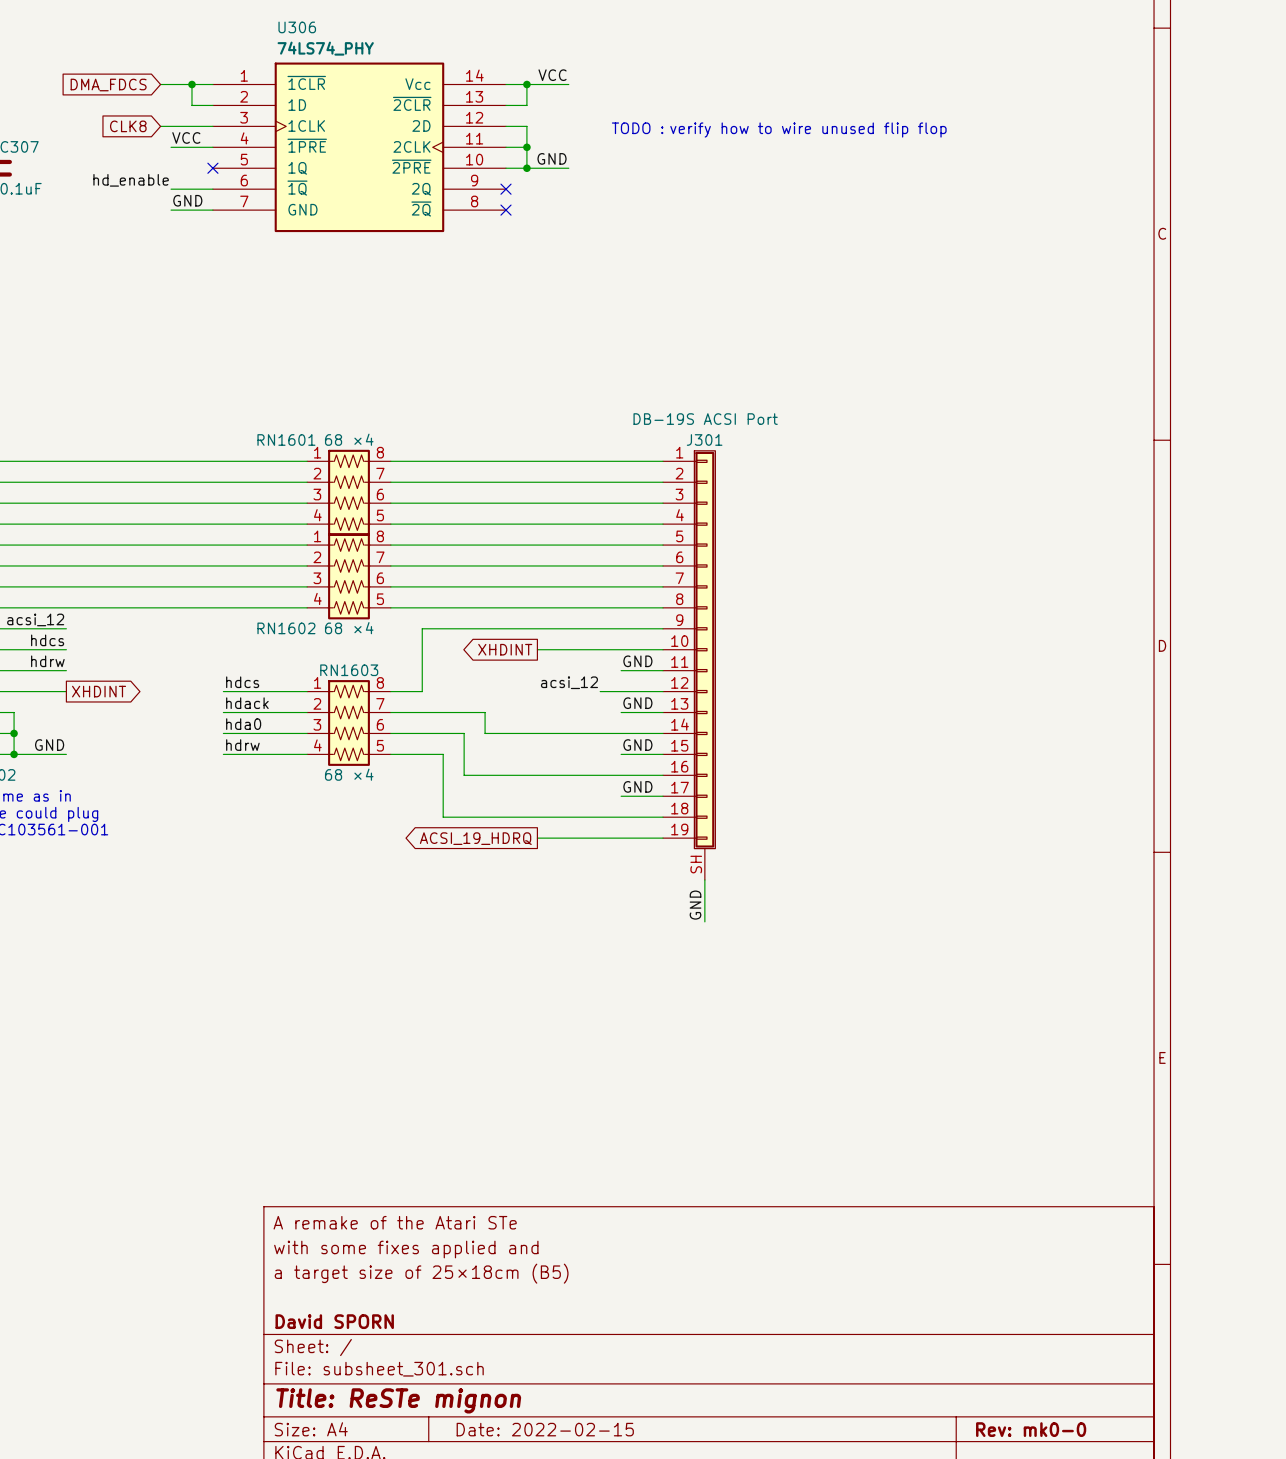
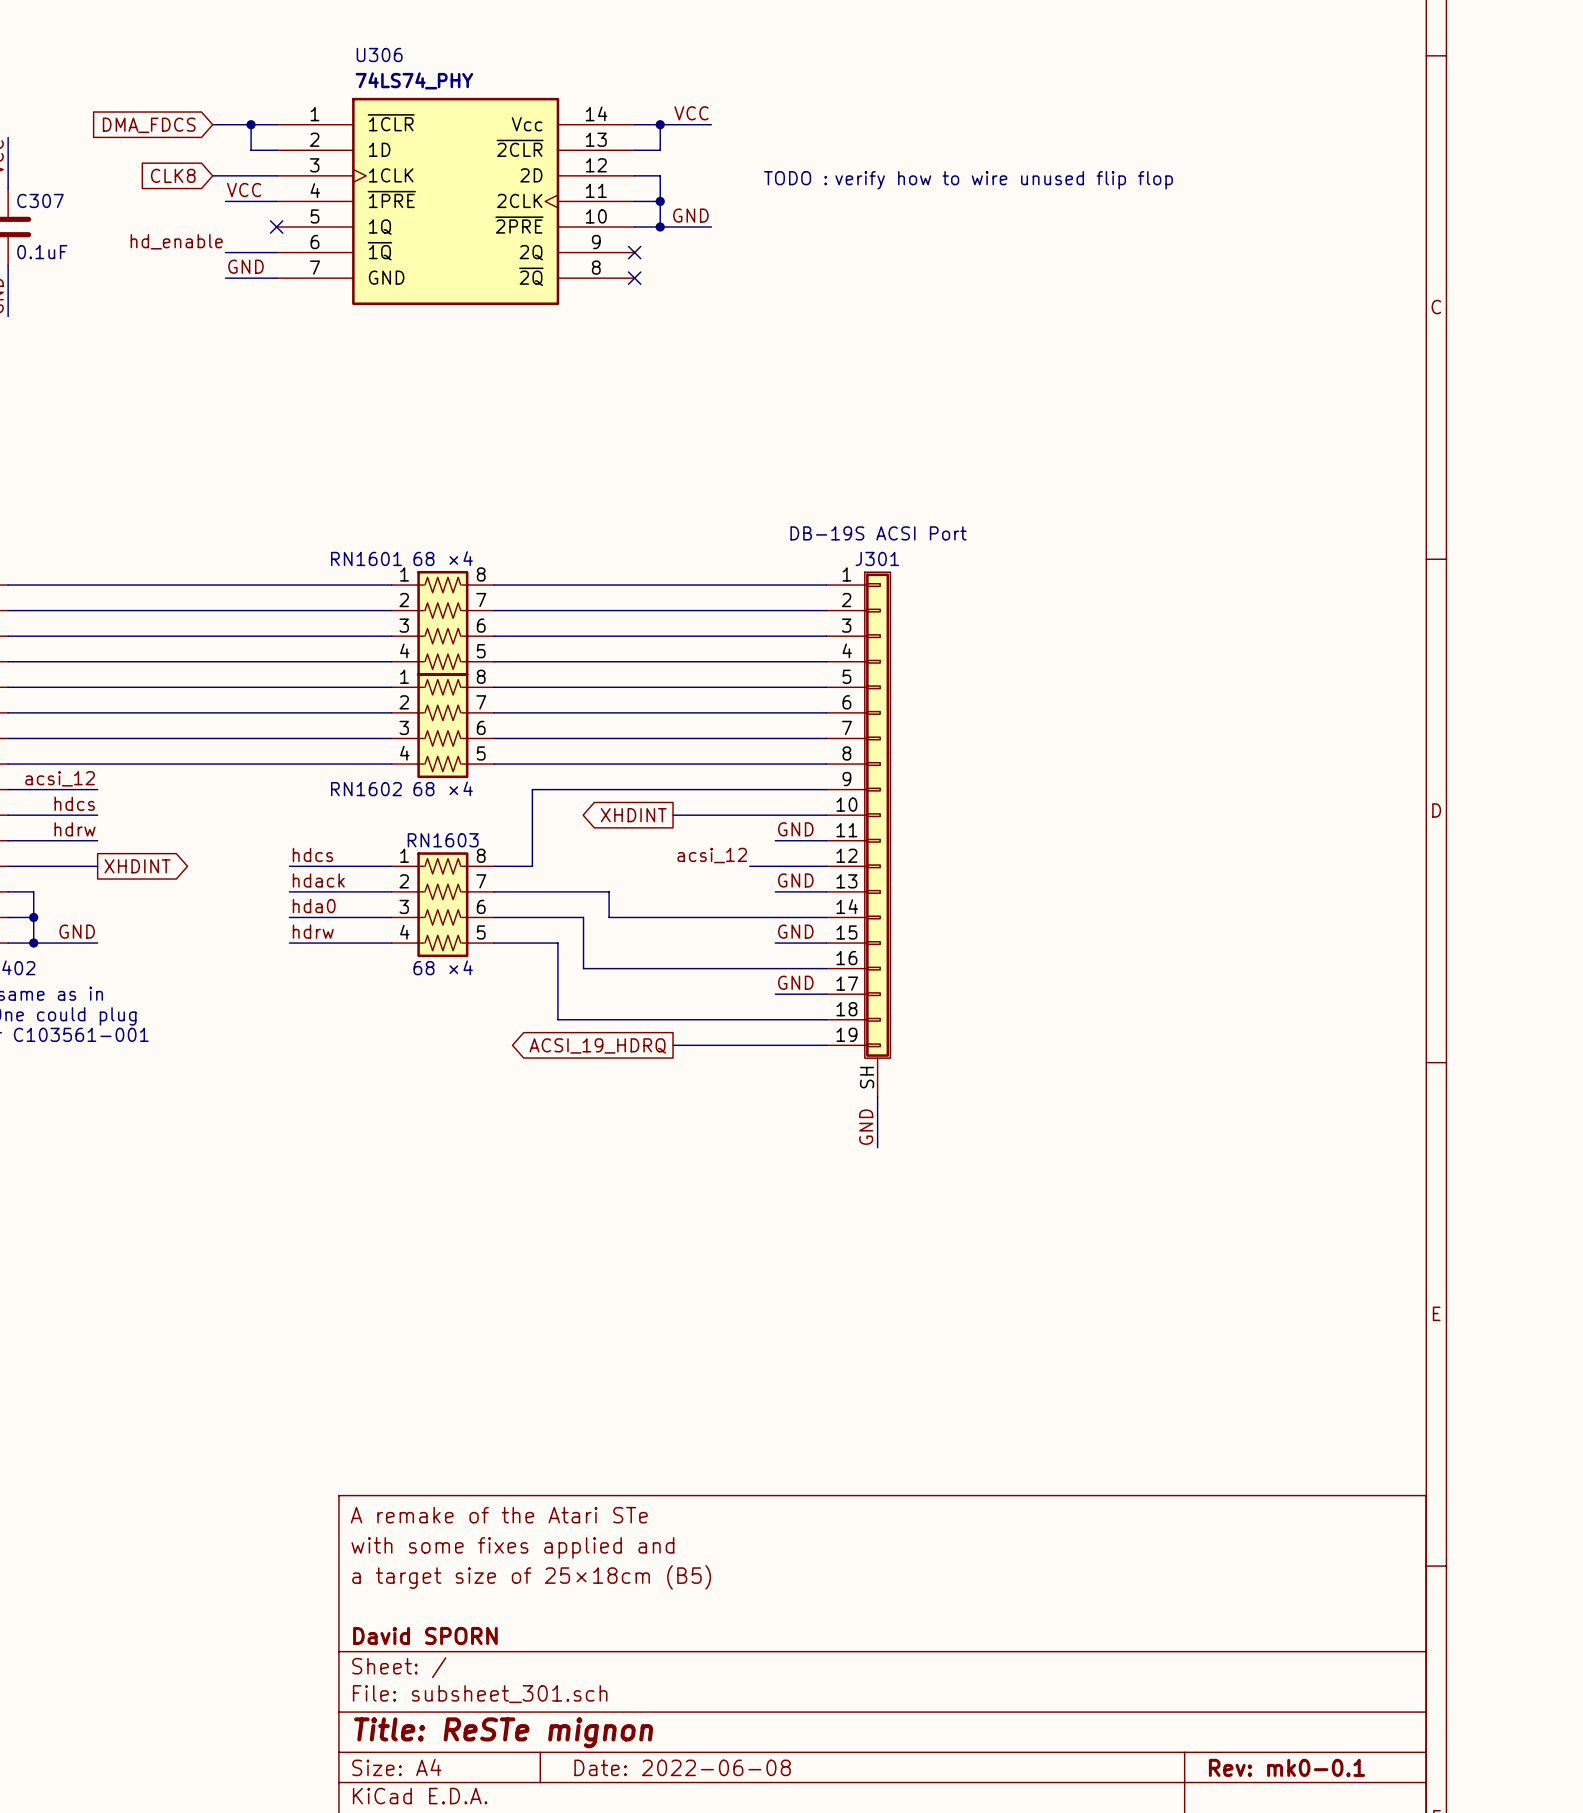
title block: Date: 2022-02-15 (545, 1429) -> Date: 2022-06-08 (682, 1767)
title block: Rev: mk0-0 (1031, 1429) -> Rev: mk0-0.1 (1286, 1767)

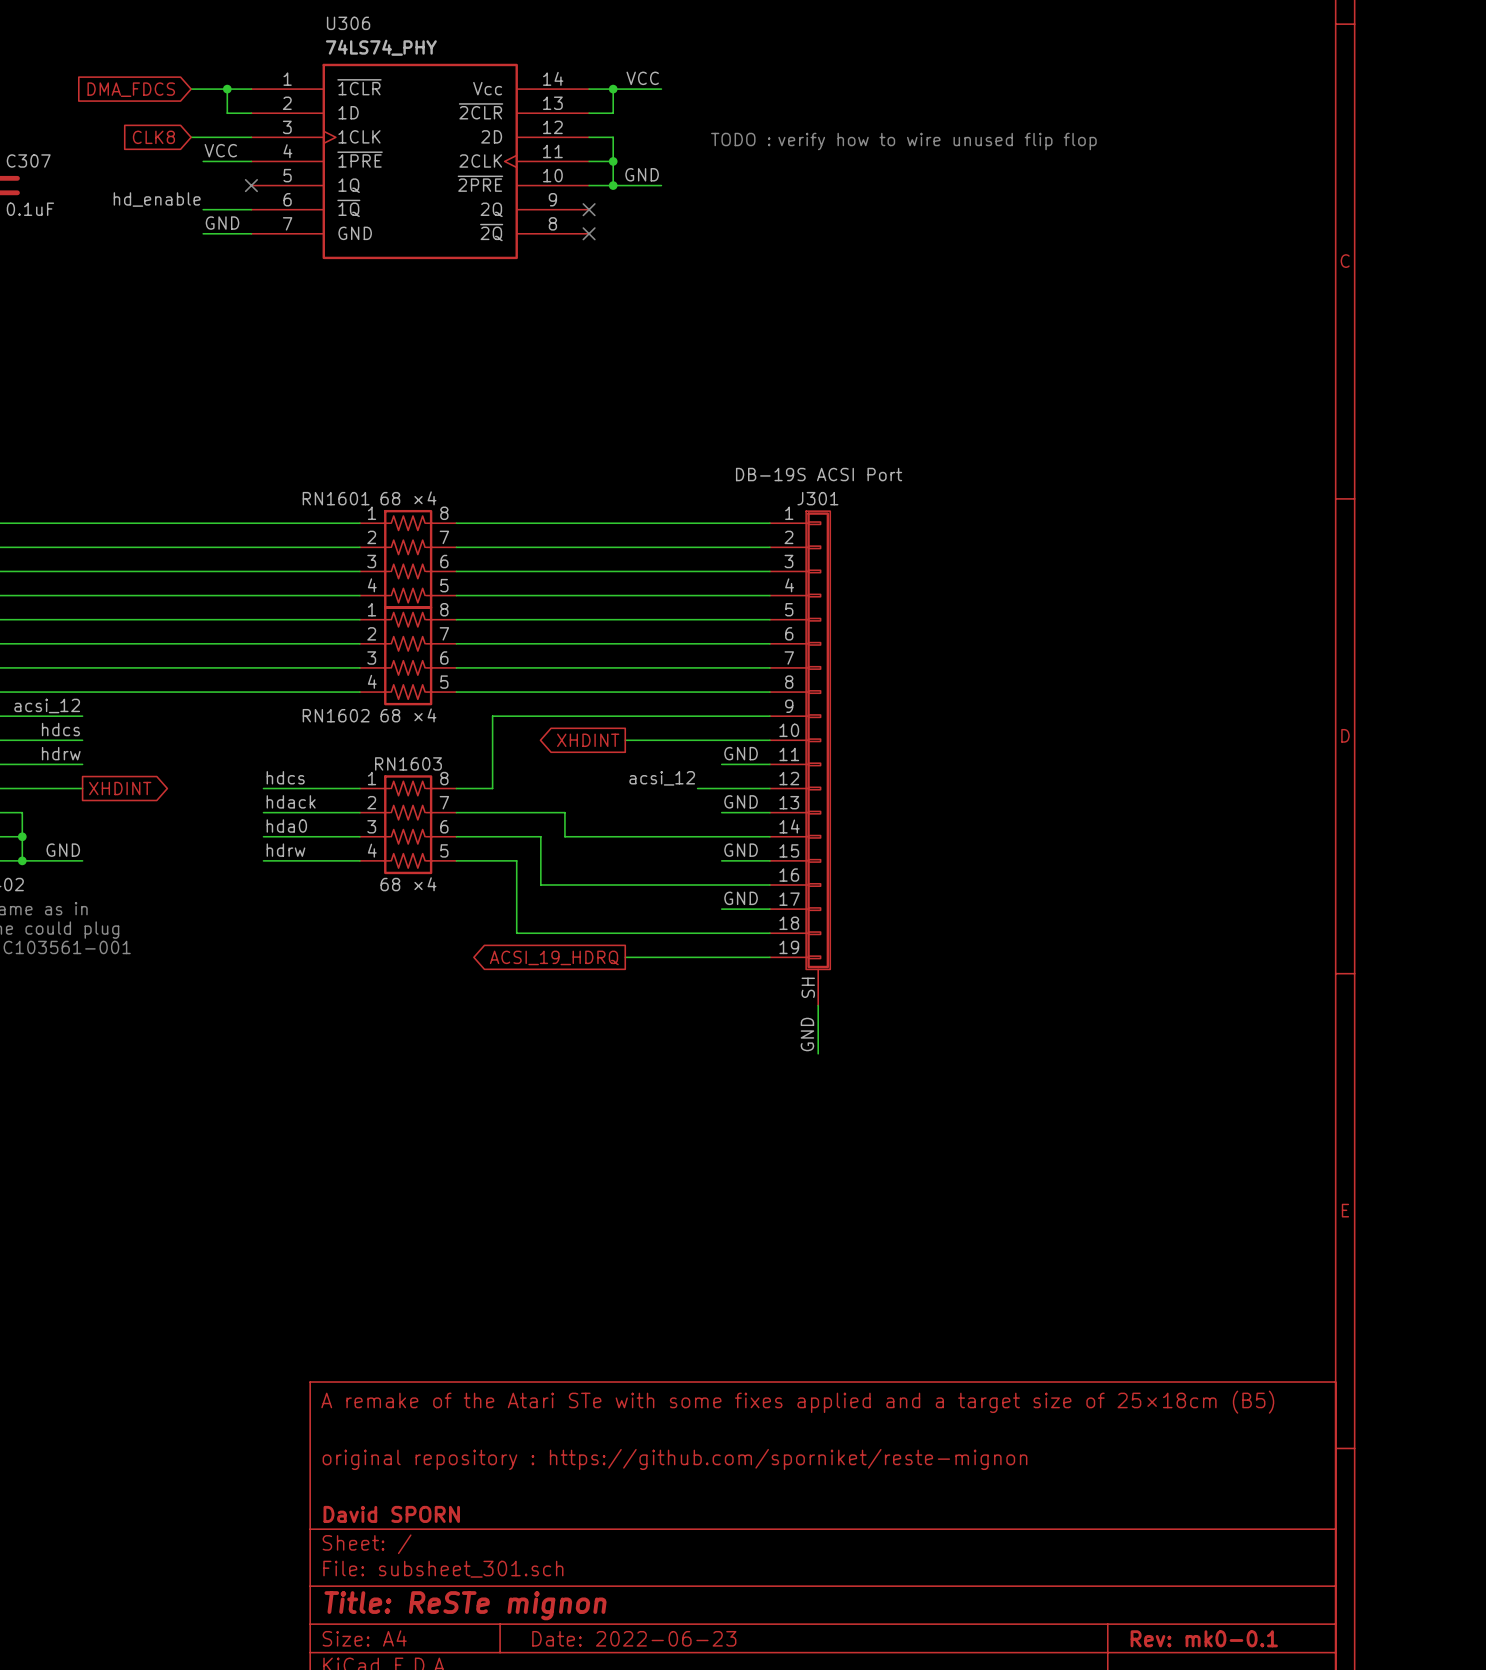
title block: A remake of the Atari STe (499, 1515) -> A remake of the Atari STe with some fixes applied and a target size of 25×18cm (B5) (797, 1402)
title block: with some fixes applied and (512, 1547) -> none
title block: a target size of 25×18cm (B5) (531, 1577) -> original repository : https://github.com/sporniket/reste-mignon (675, 1459)
title block: Date: 2022-06-08 (682, 1767) -> Date: 2022-06-23 (634, 1638)

